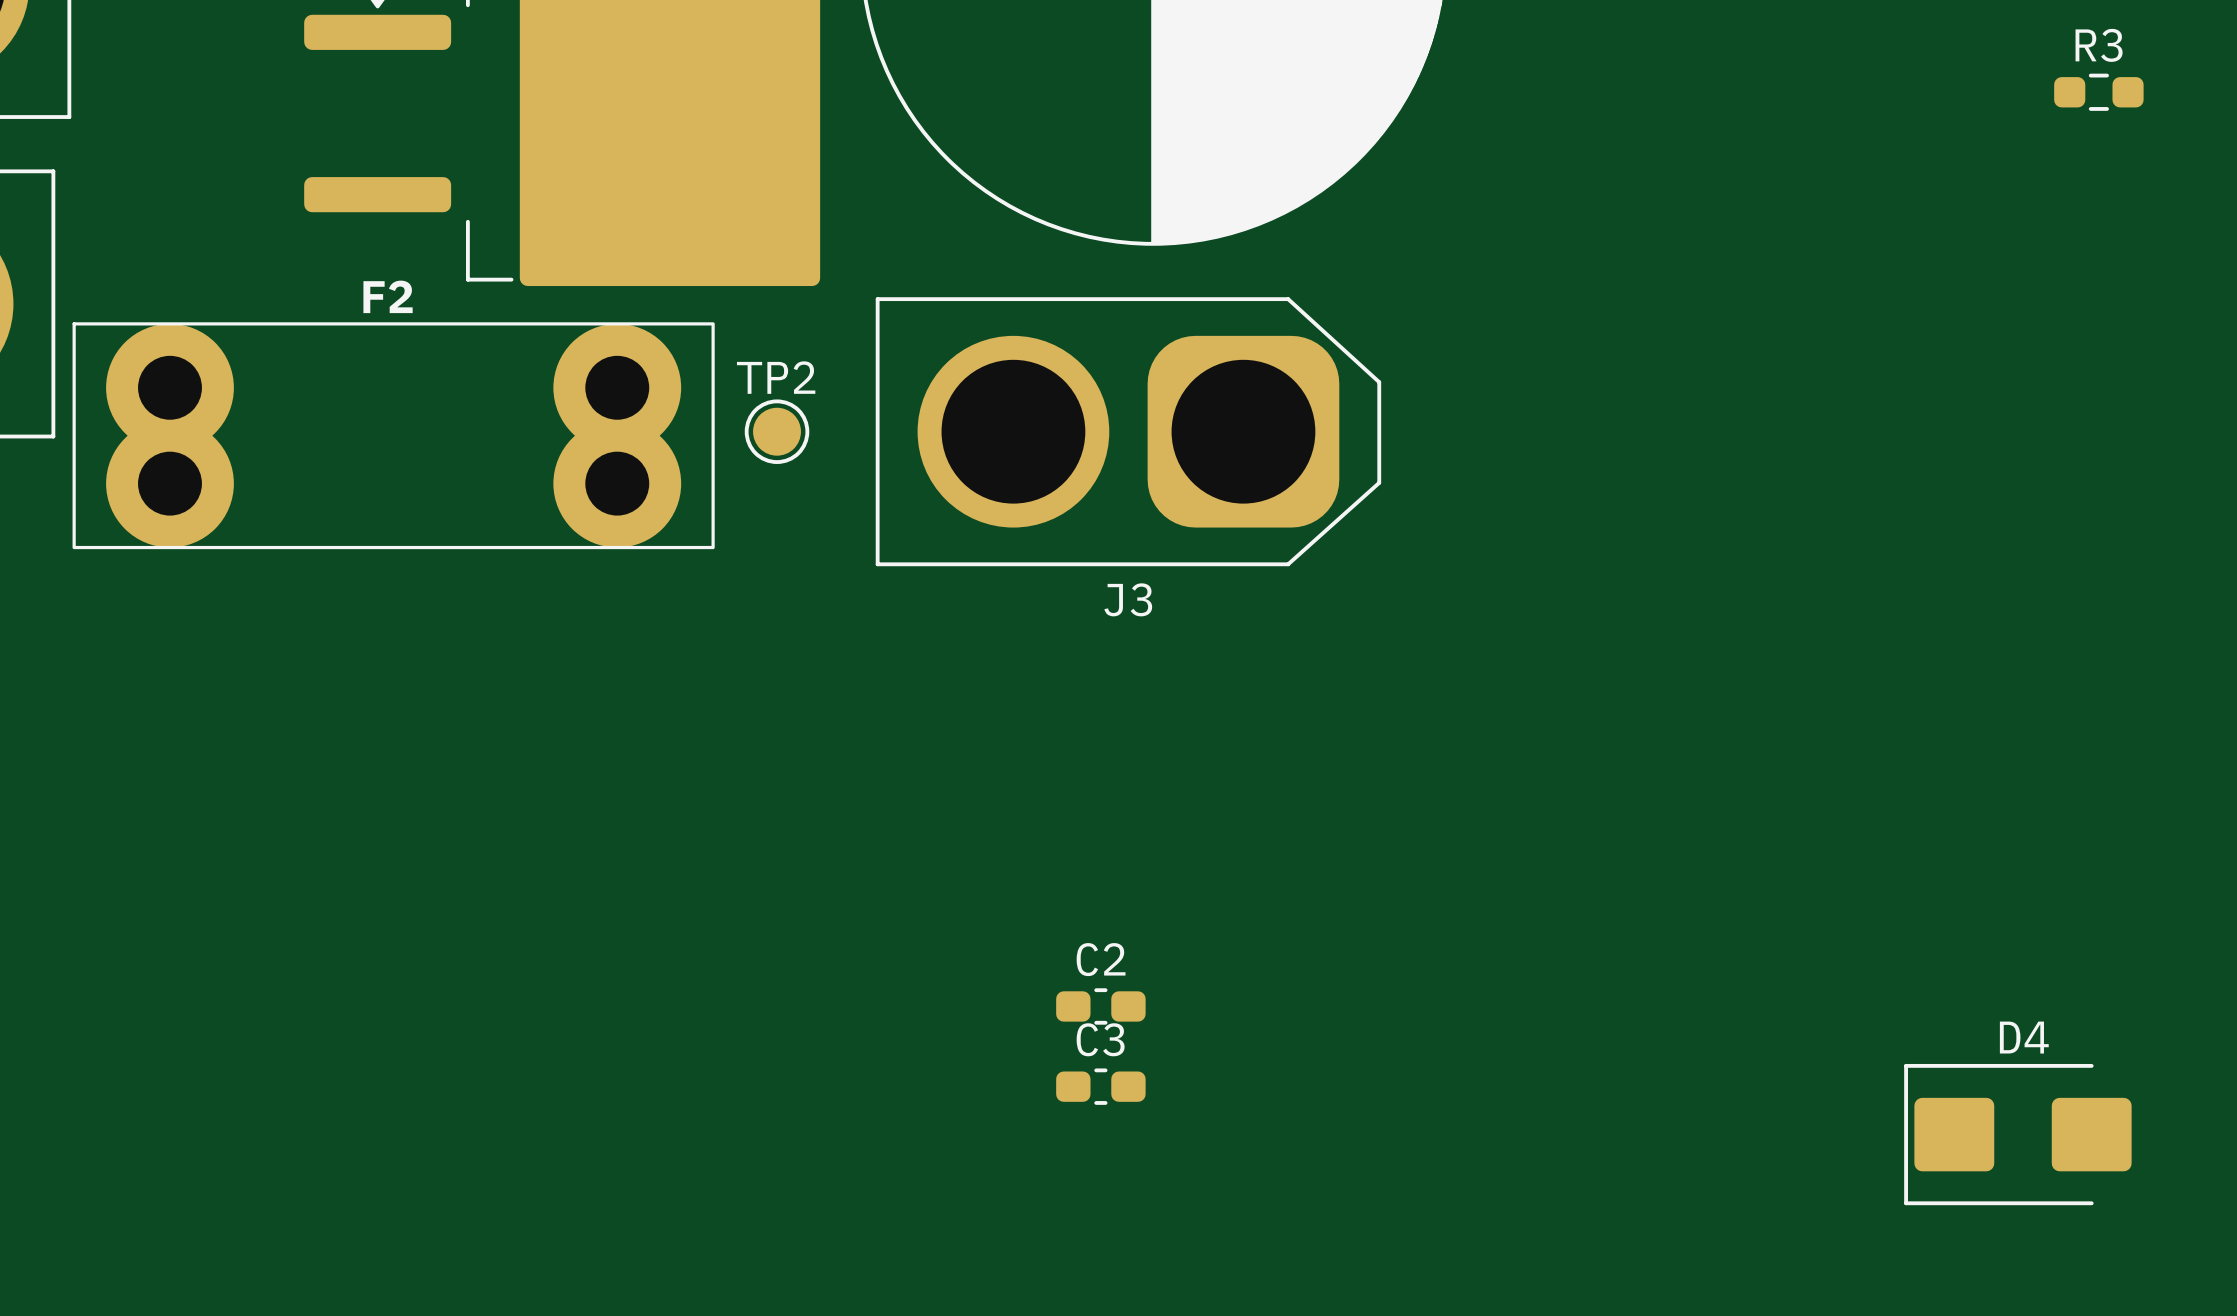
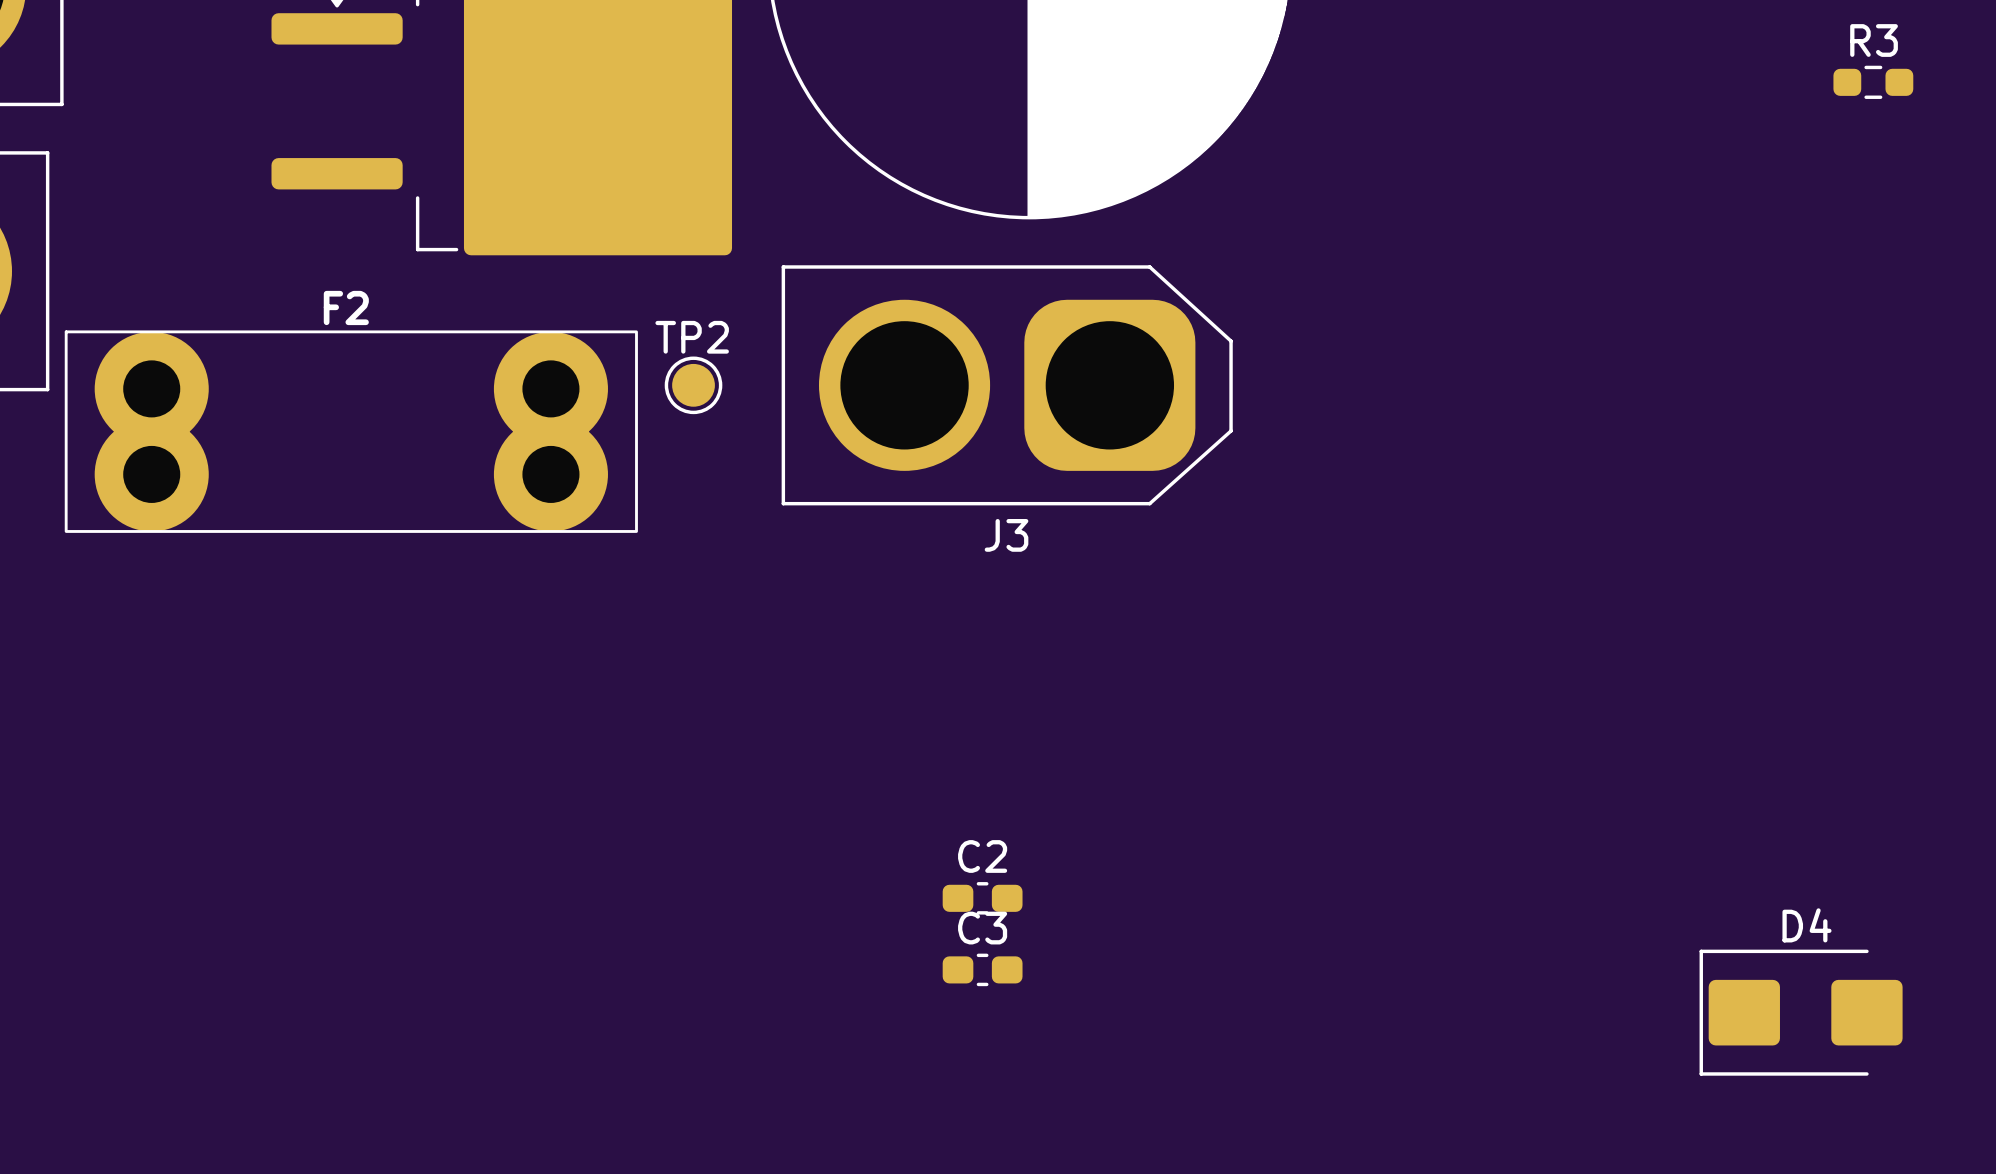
F2 position: (393, 435) -> (351, 431)

